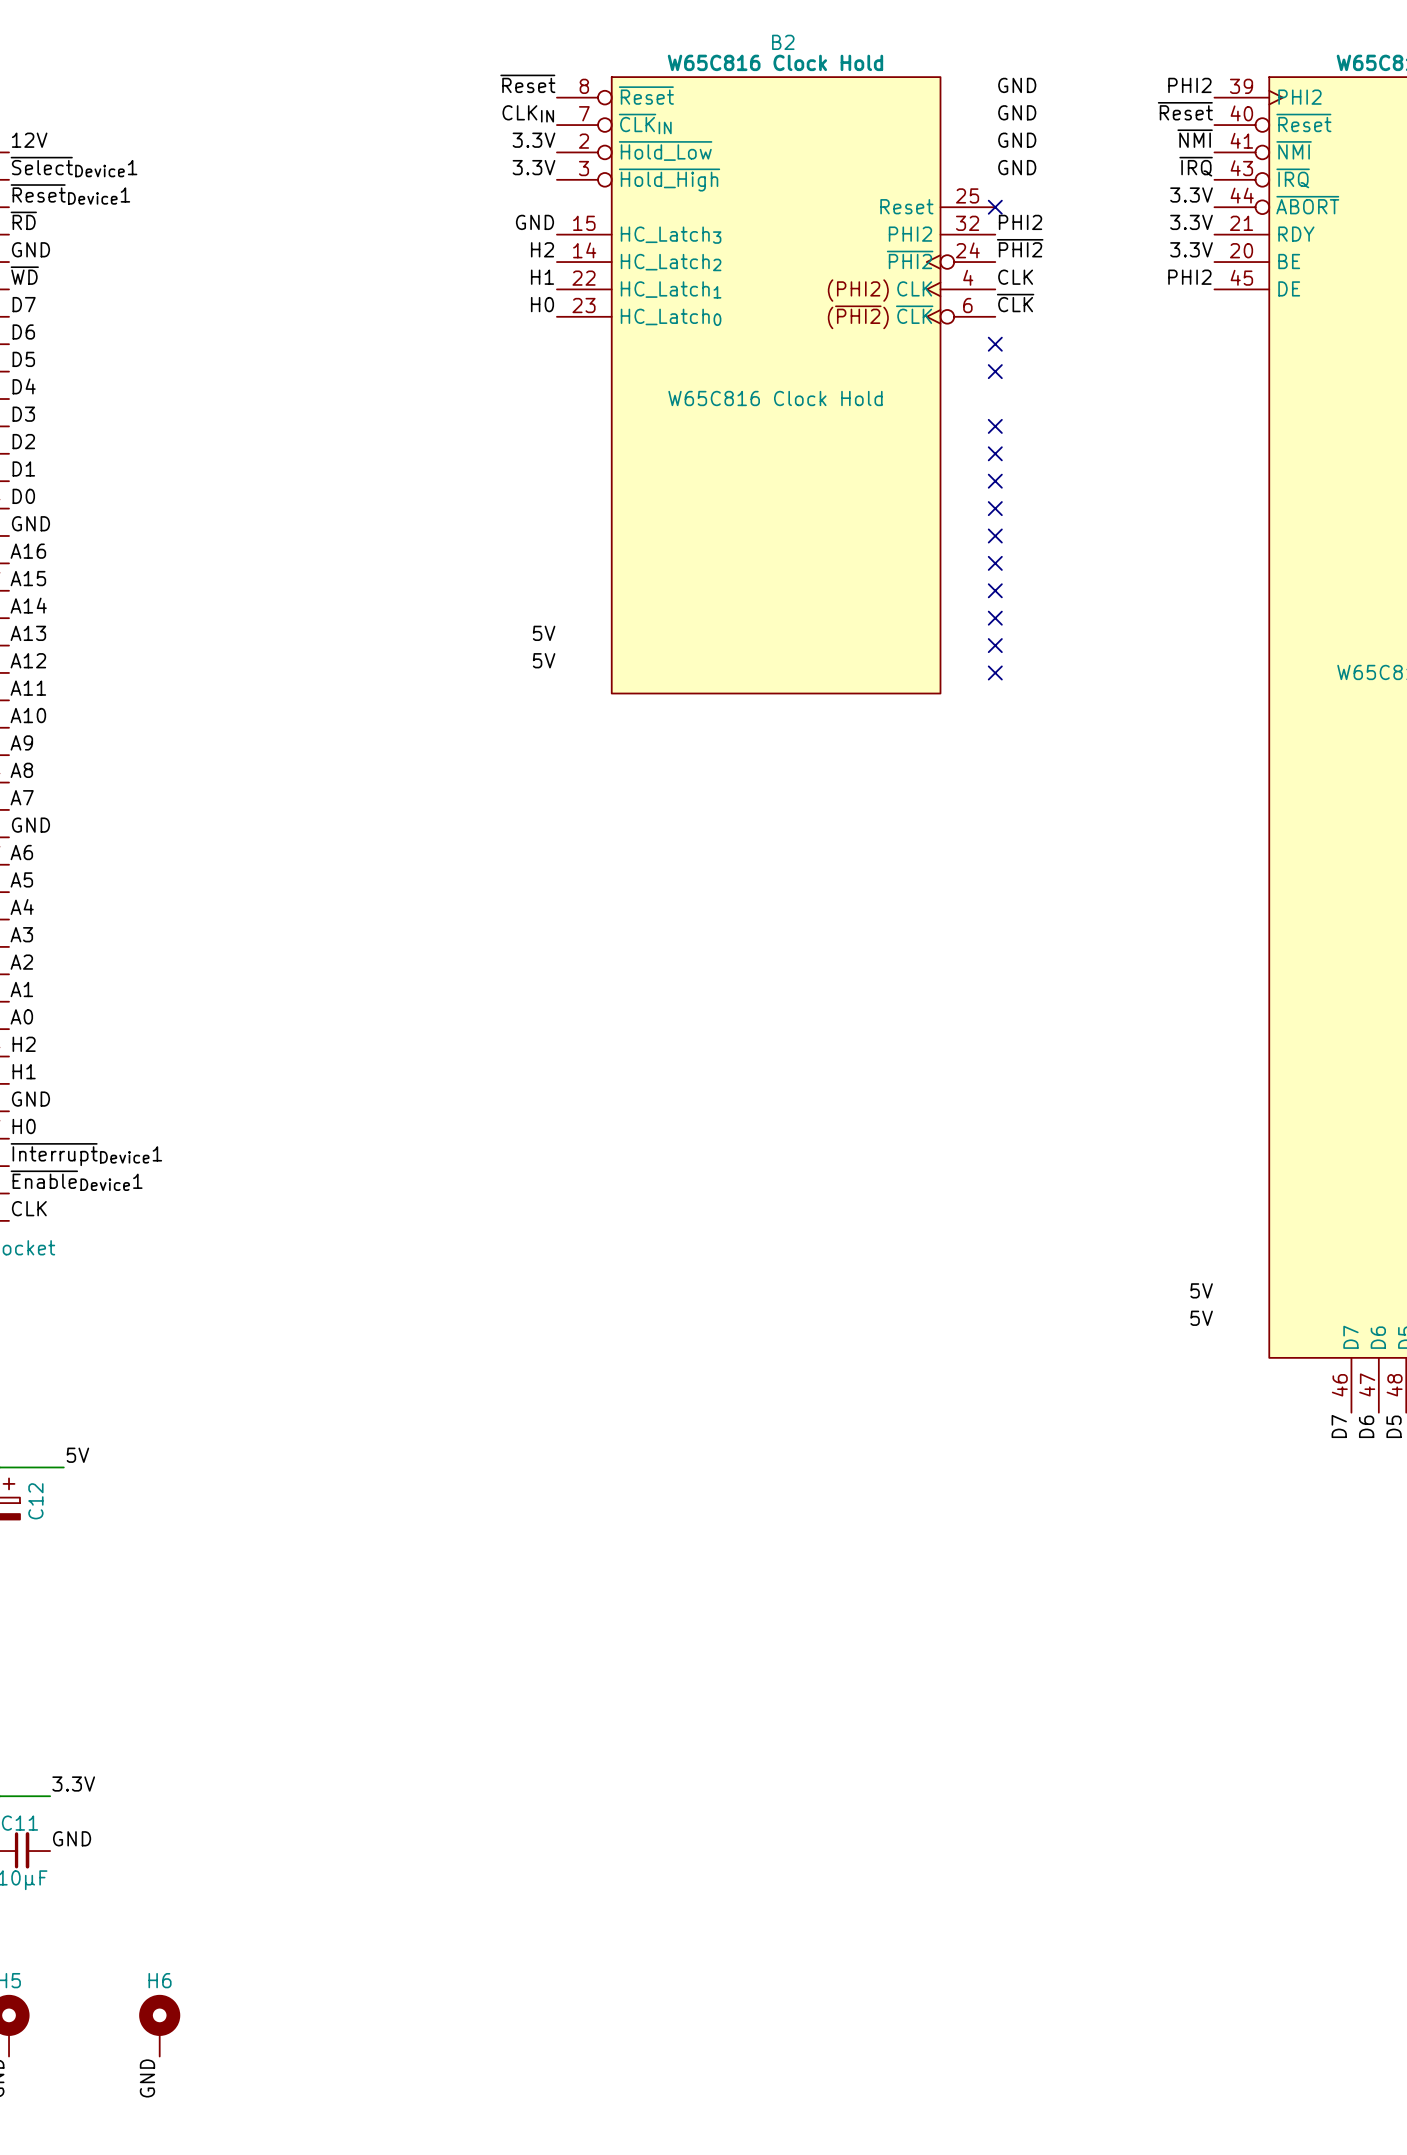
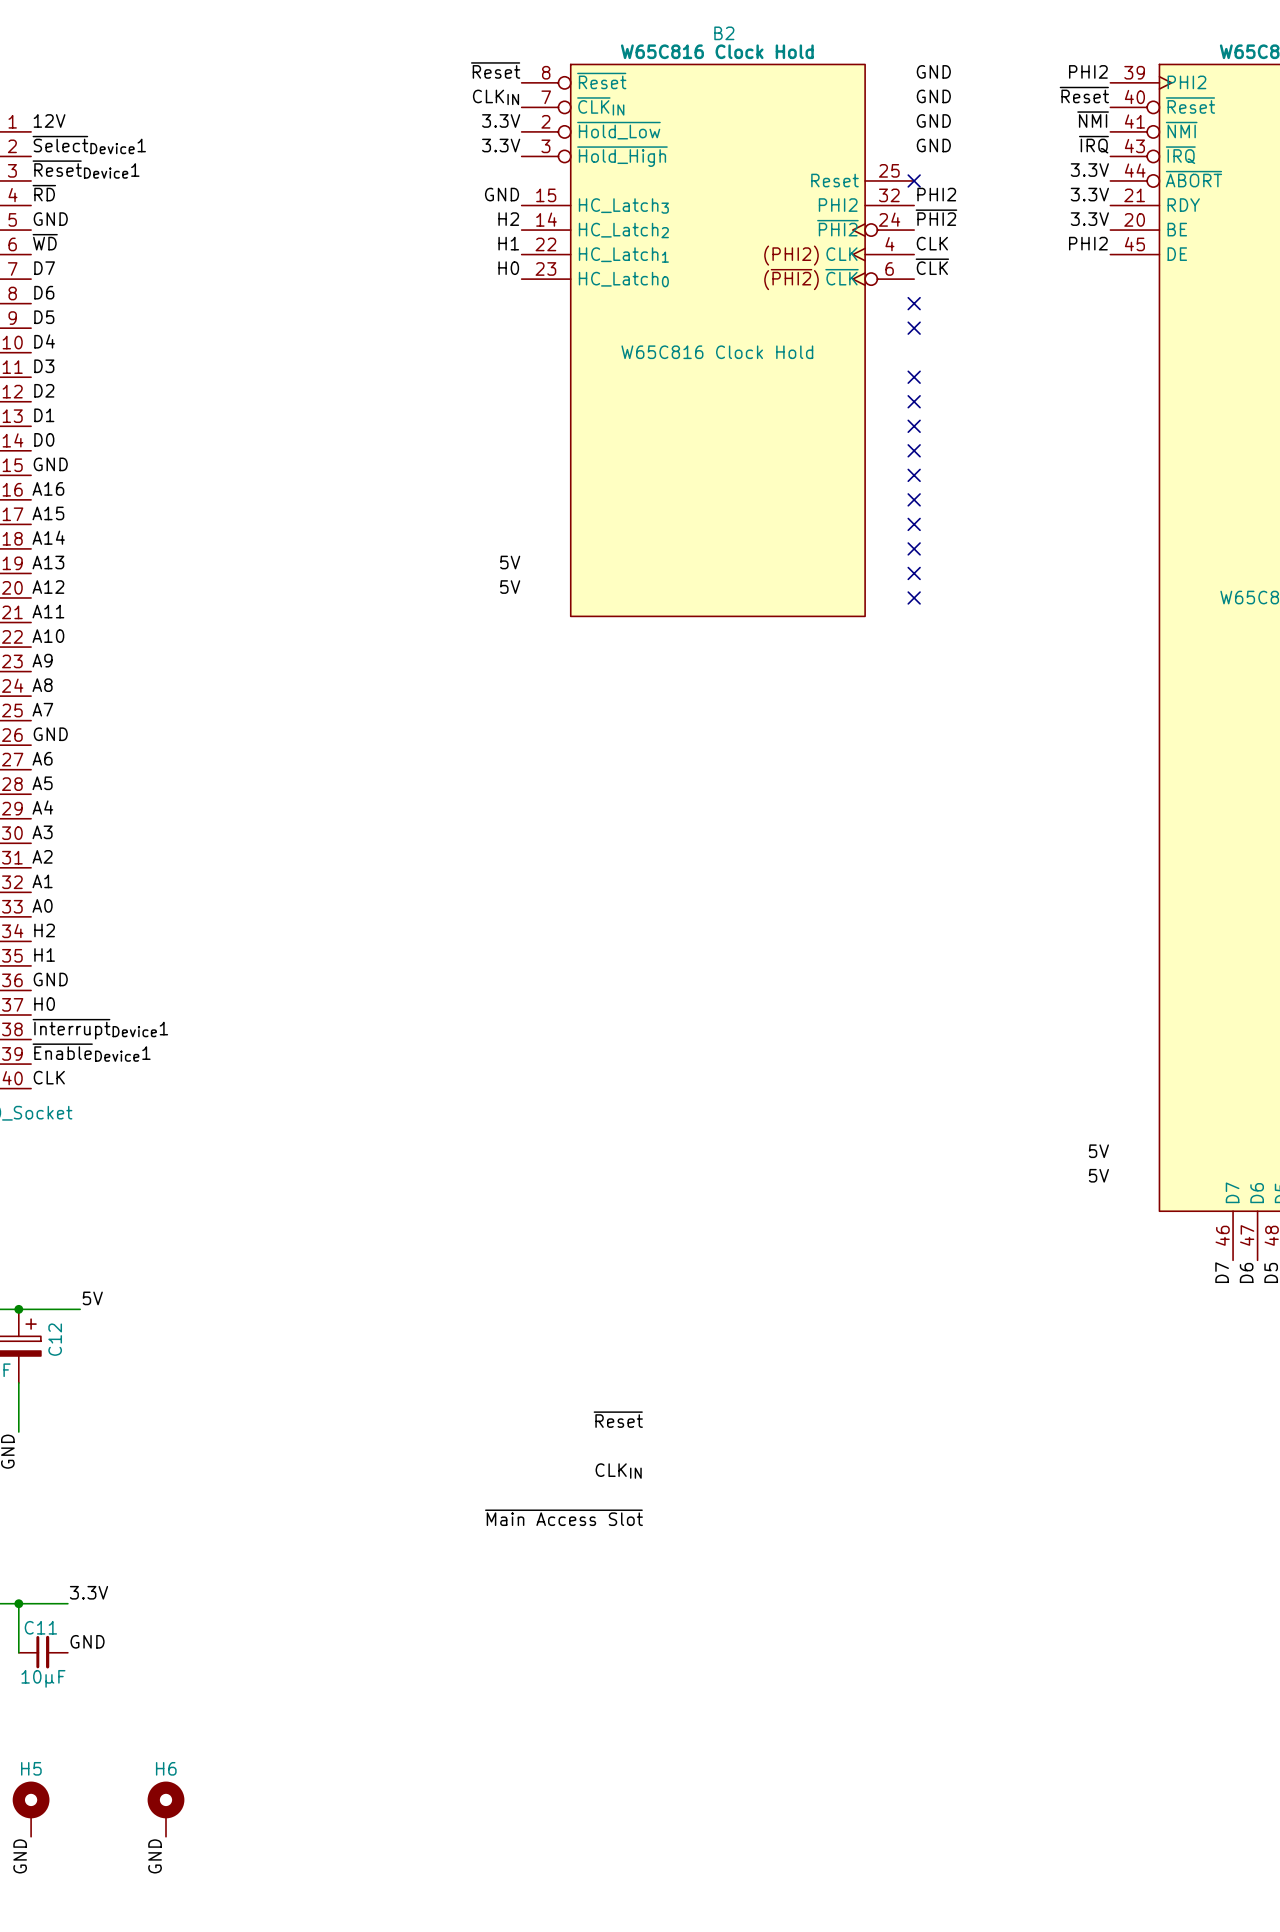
label: none -> ~{Reset} (618, 1419)
label: none -> CLKIN (618, 1471)
label: none -> ~{Main Access Slot} (563, 1517)

